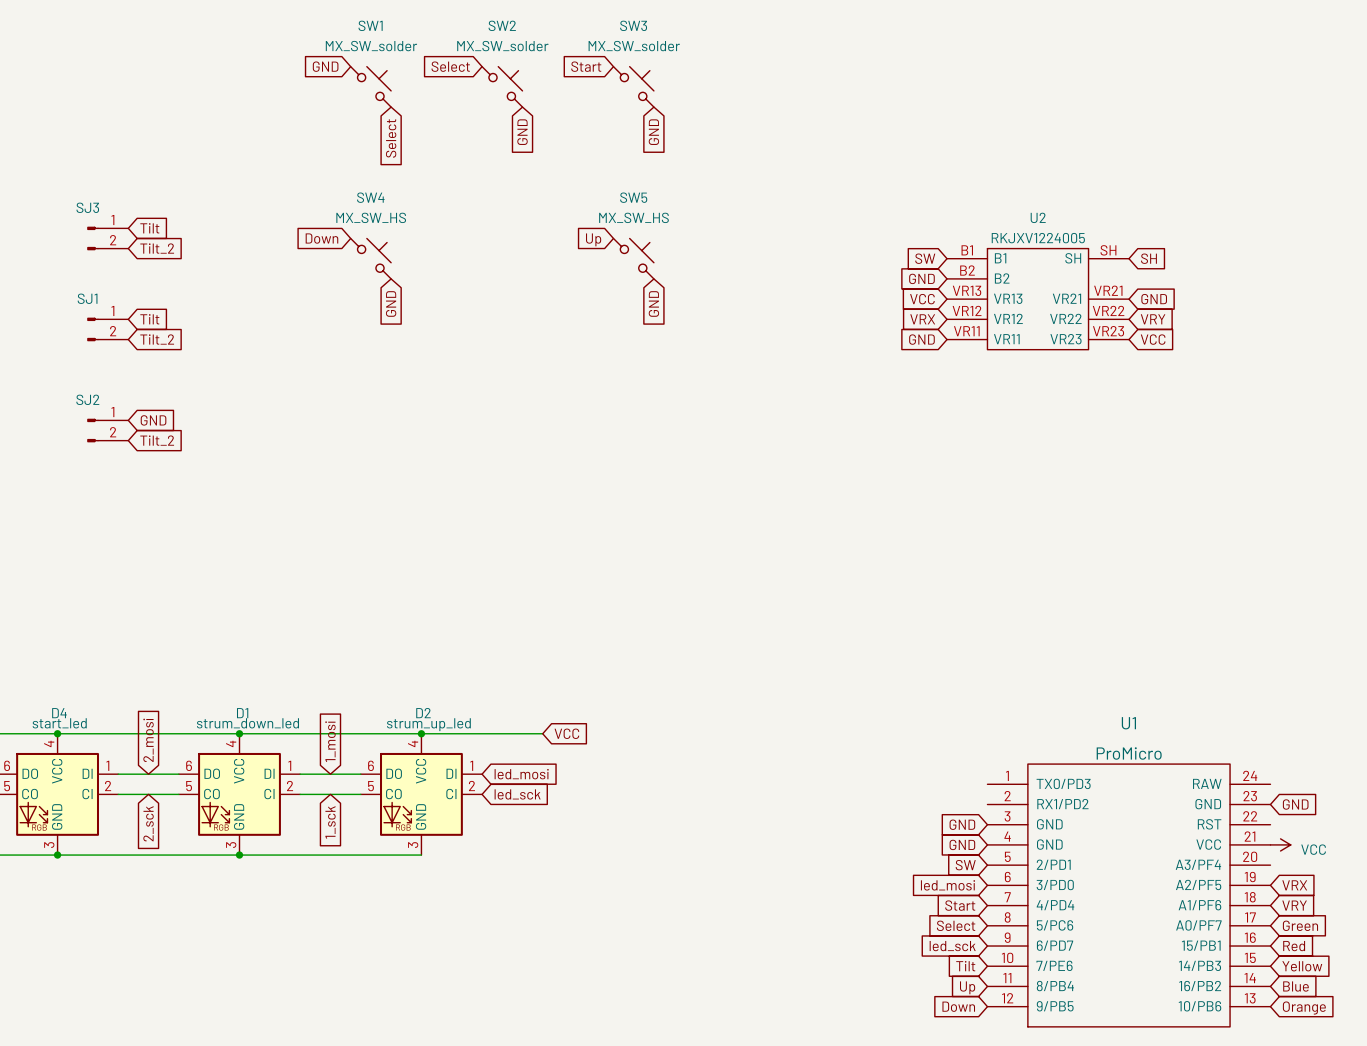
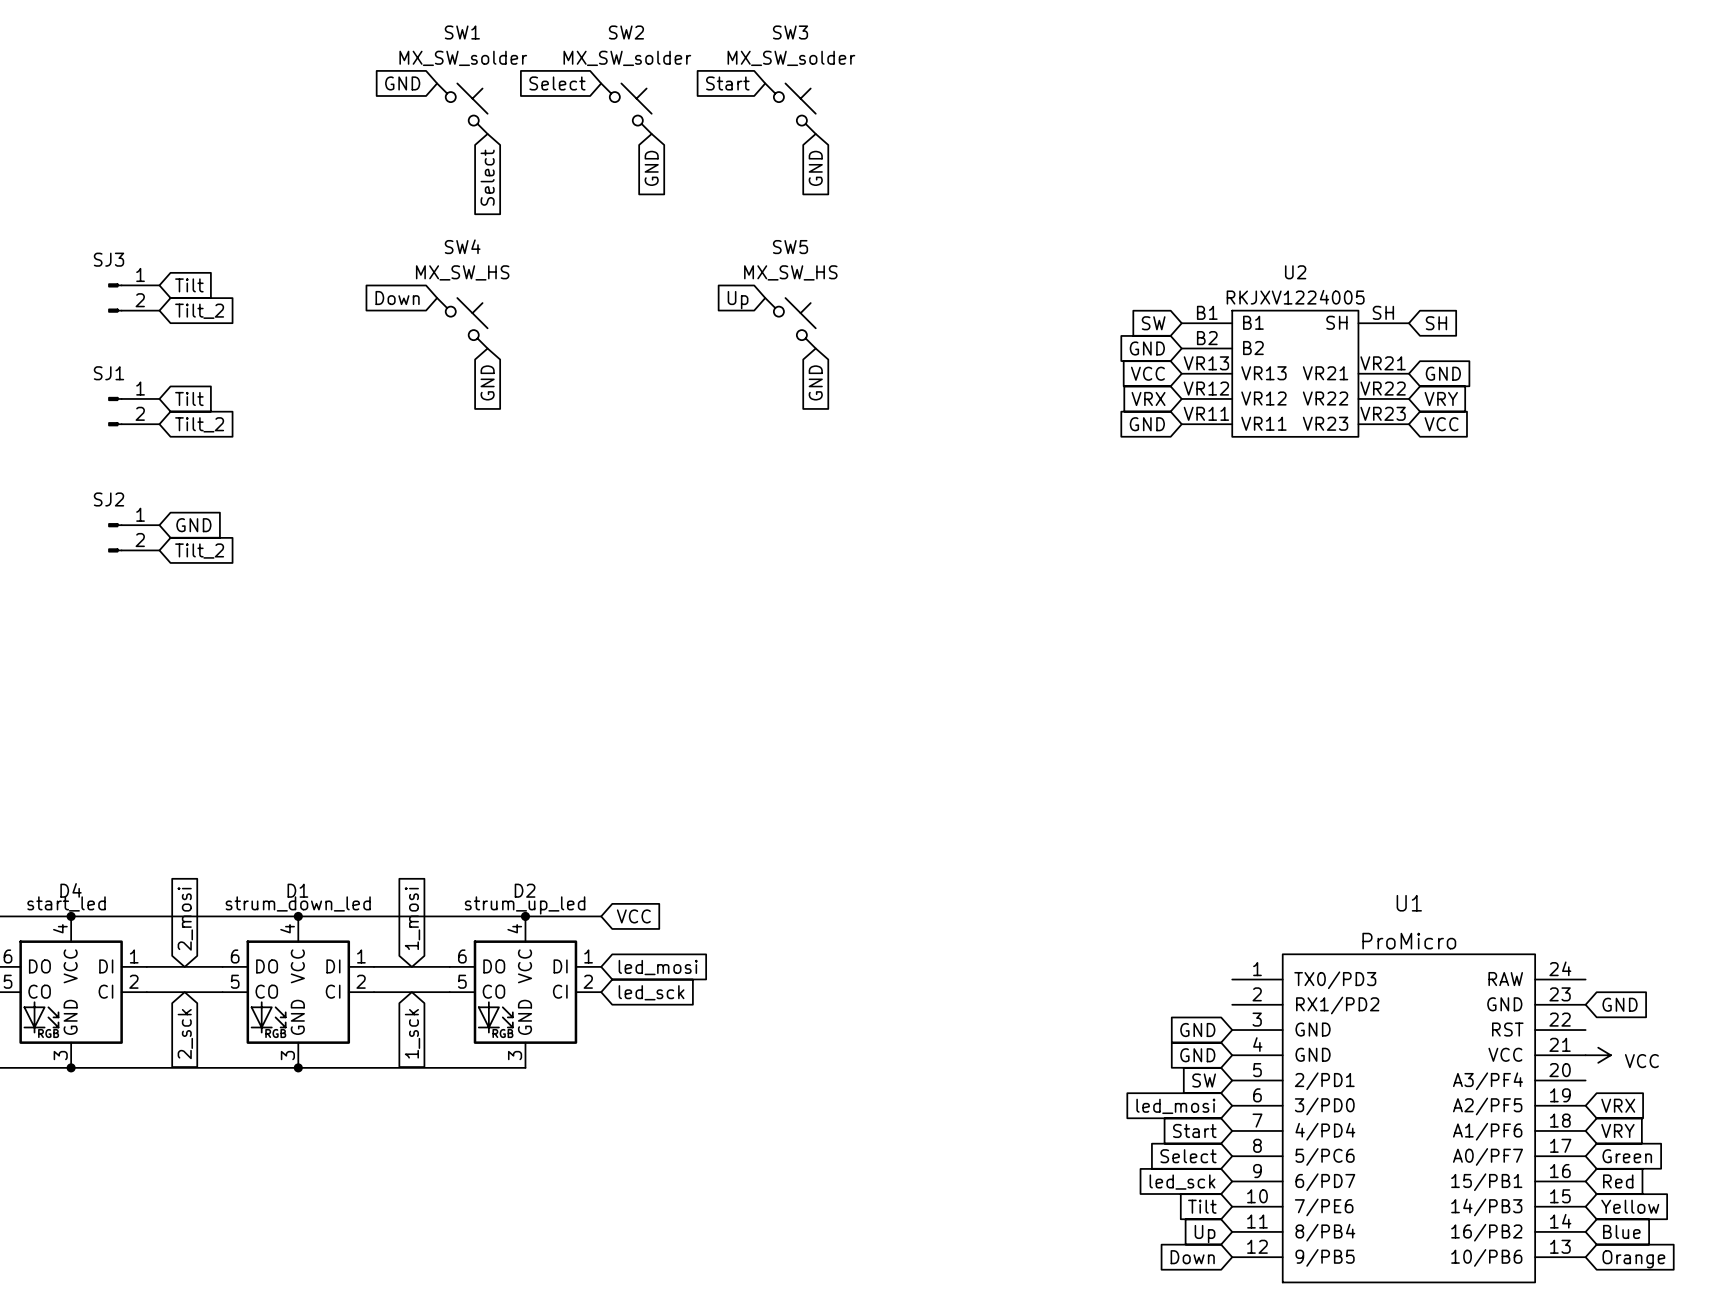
wire: (482, 733) (542, 733) -> none
global label position: VCC (566, 733) -> VCC (633, 916)

